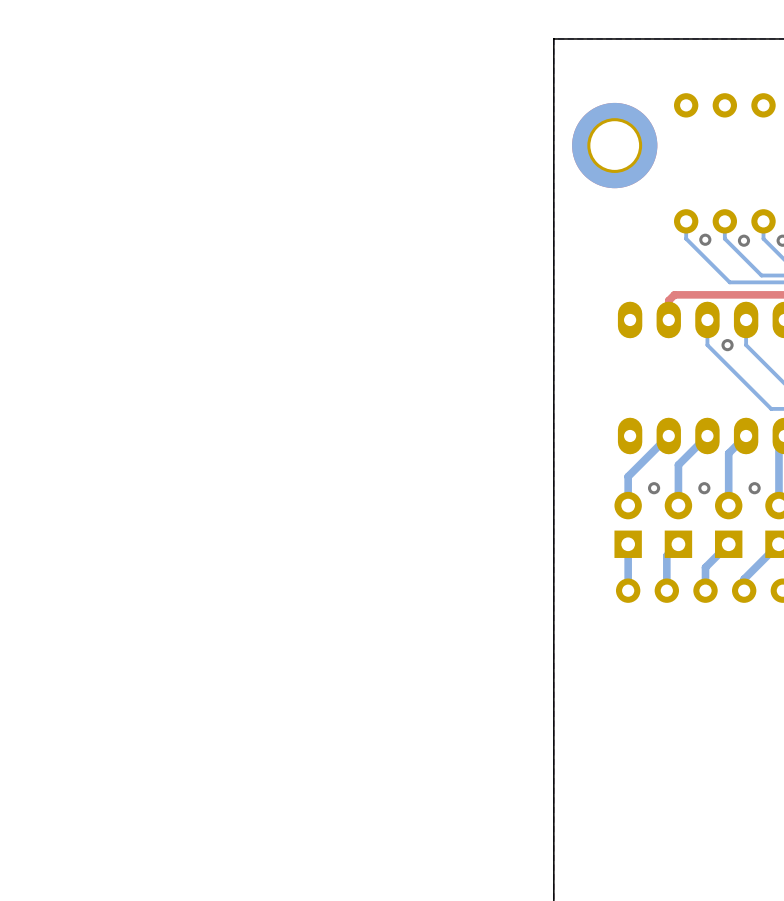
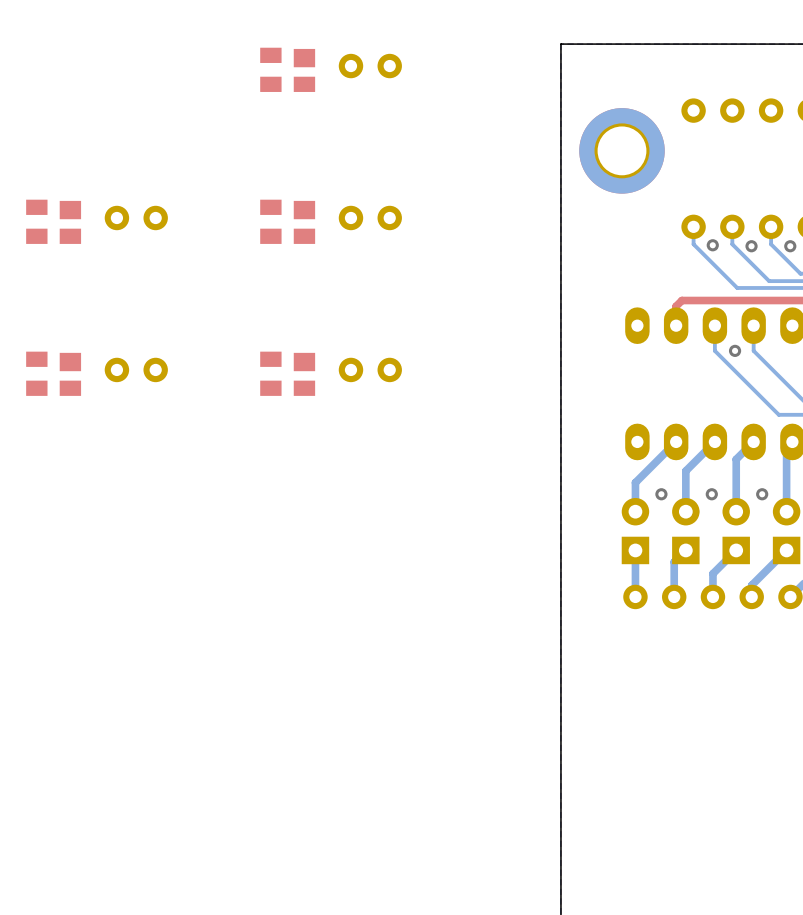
part: none -> (370, 66)
part: none -> (287, 69)
part: none -> (136, 217)
part: none -> (370, 217)
part: none -> (53, 221)
part: none -> (287, 221)
part: none -> (136, 369)
part: none -> (370, 369)
part: none -> (53, 373)
part: none -> (287, 373)

